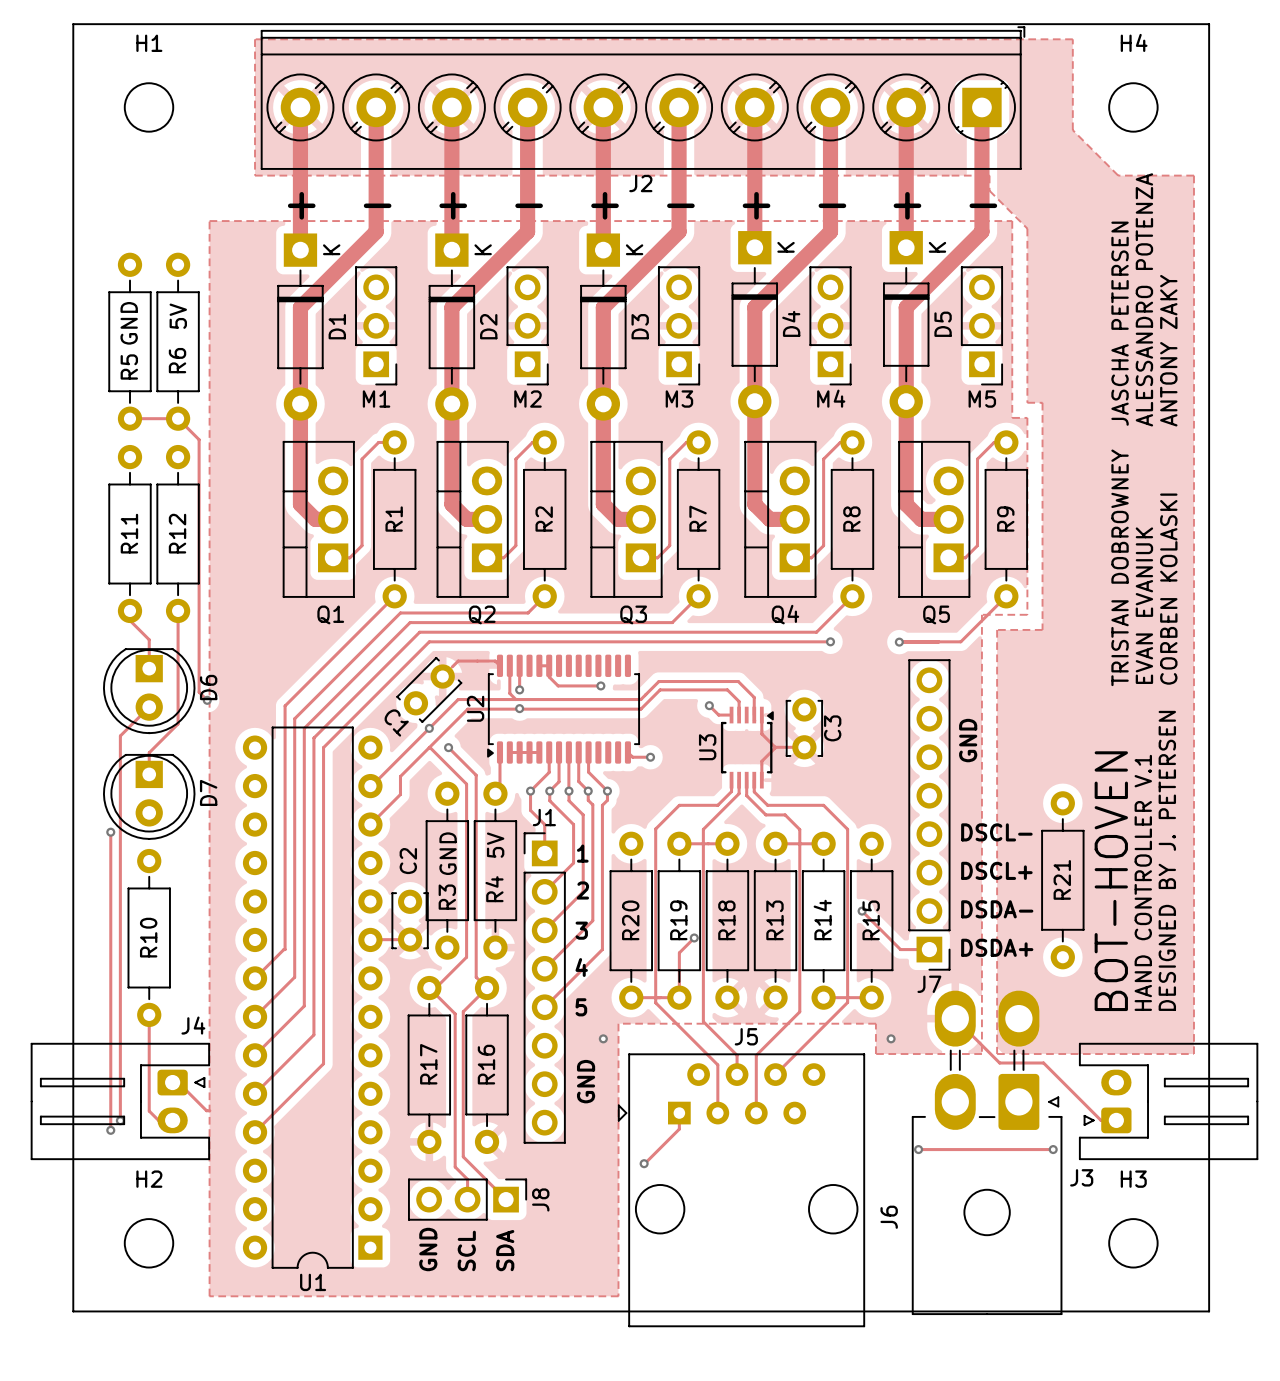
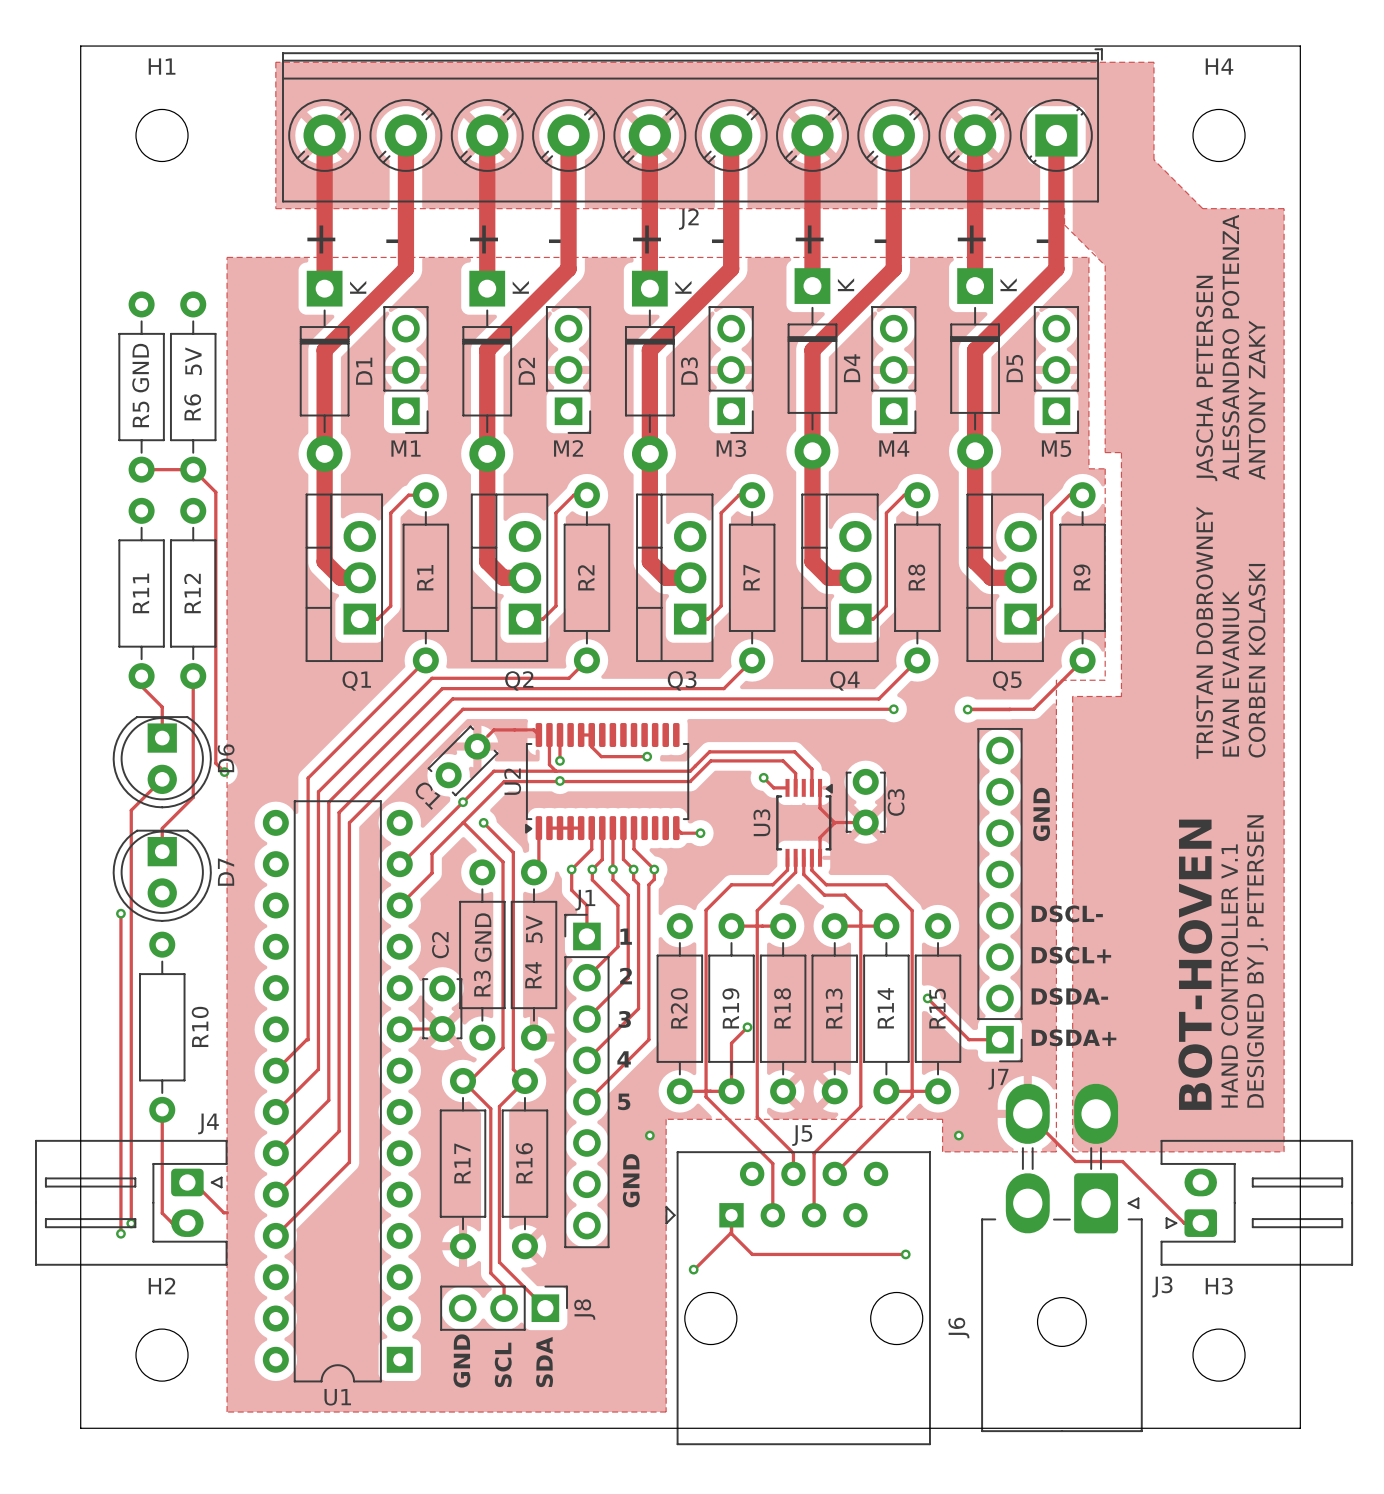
R21: (1062, 880) -> none
R10 name position: R10 (148, 937) -> R10 (200, 1026)
track: none -> (731, 1232) (752, 1254) (905, 1254)
track: (918, 1149) (1053, 1149) -> none
via position: (918, 1149) -> (905, 1254)
via: (1053, 1149) -> none

